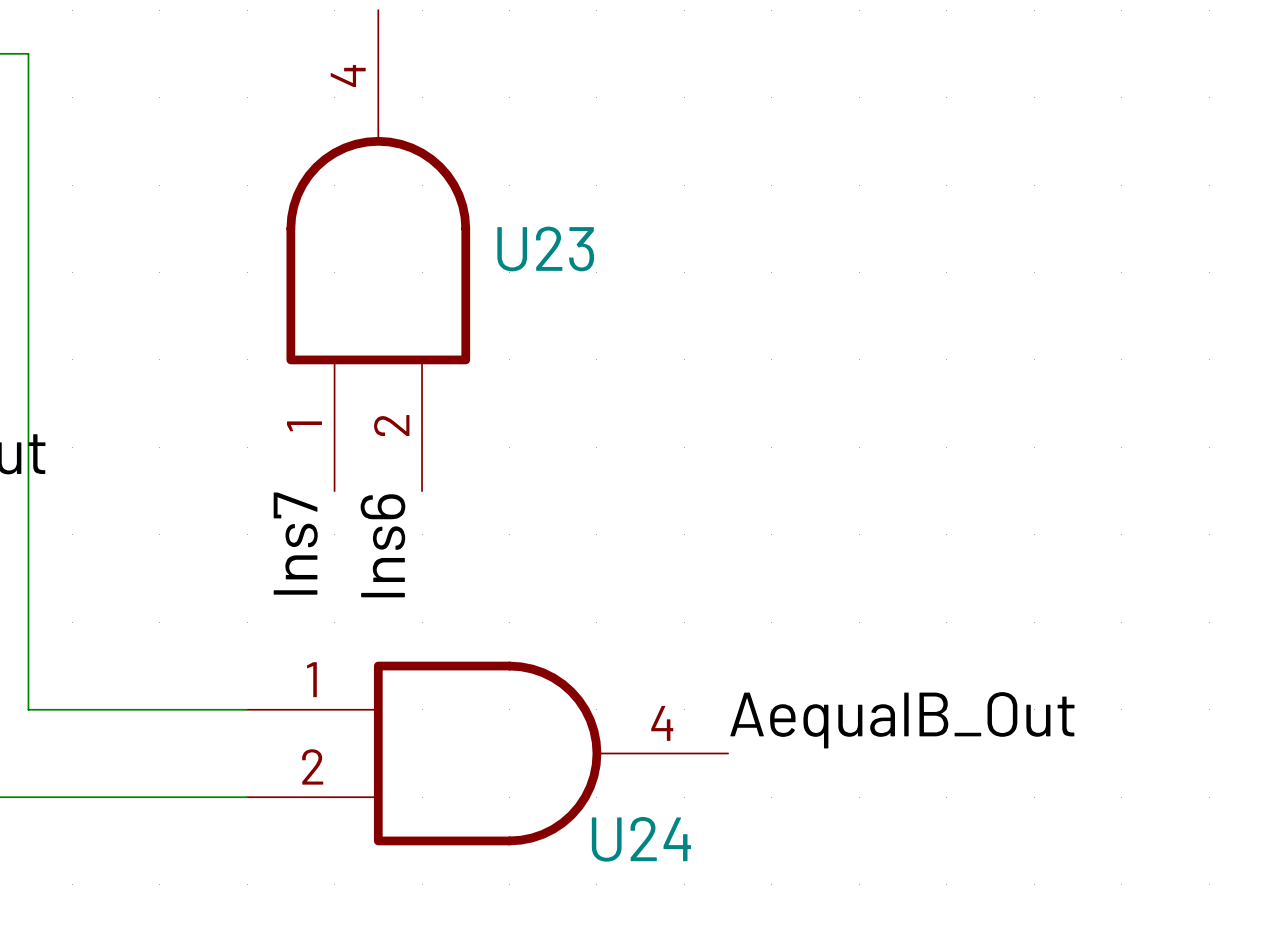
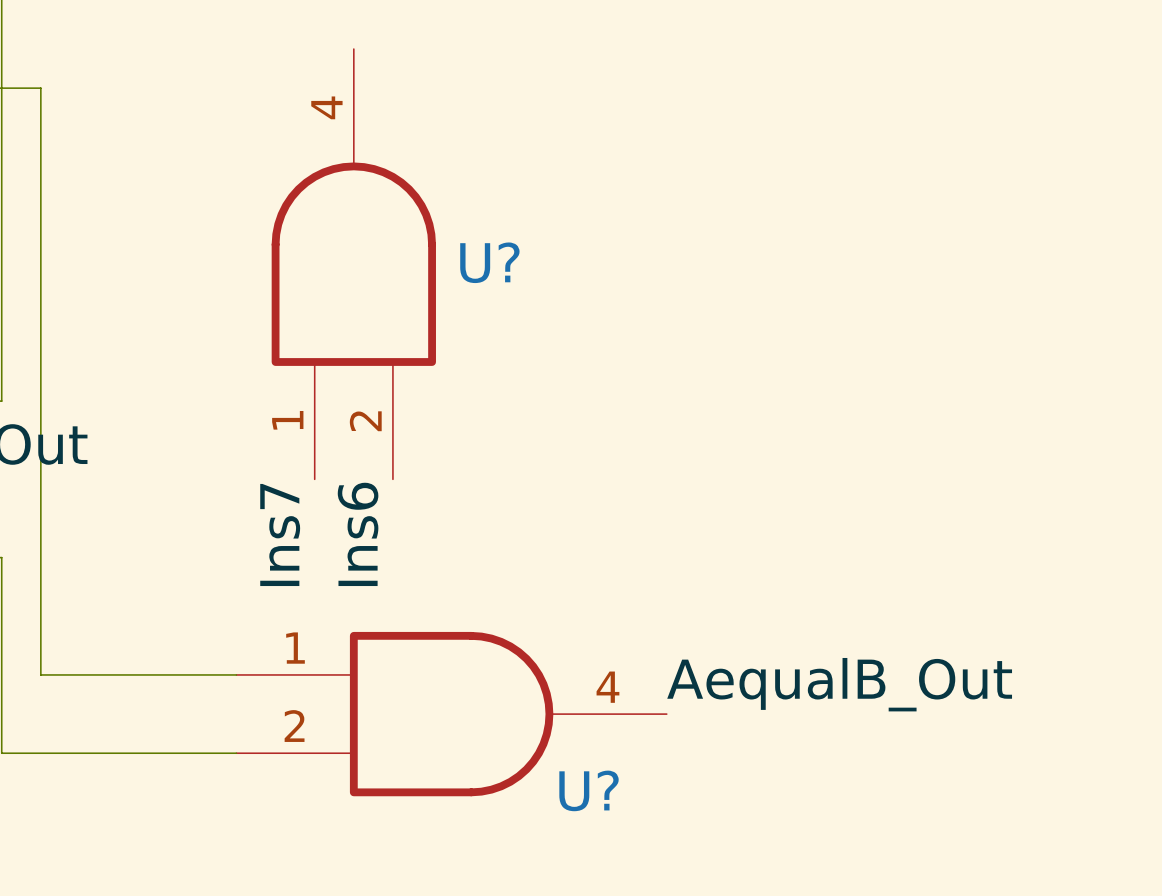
U23 name: U23 (545, 248) -> U? (489, 262)
U24 name: U24 (641, 839) -> U? (589, 790)

